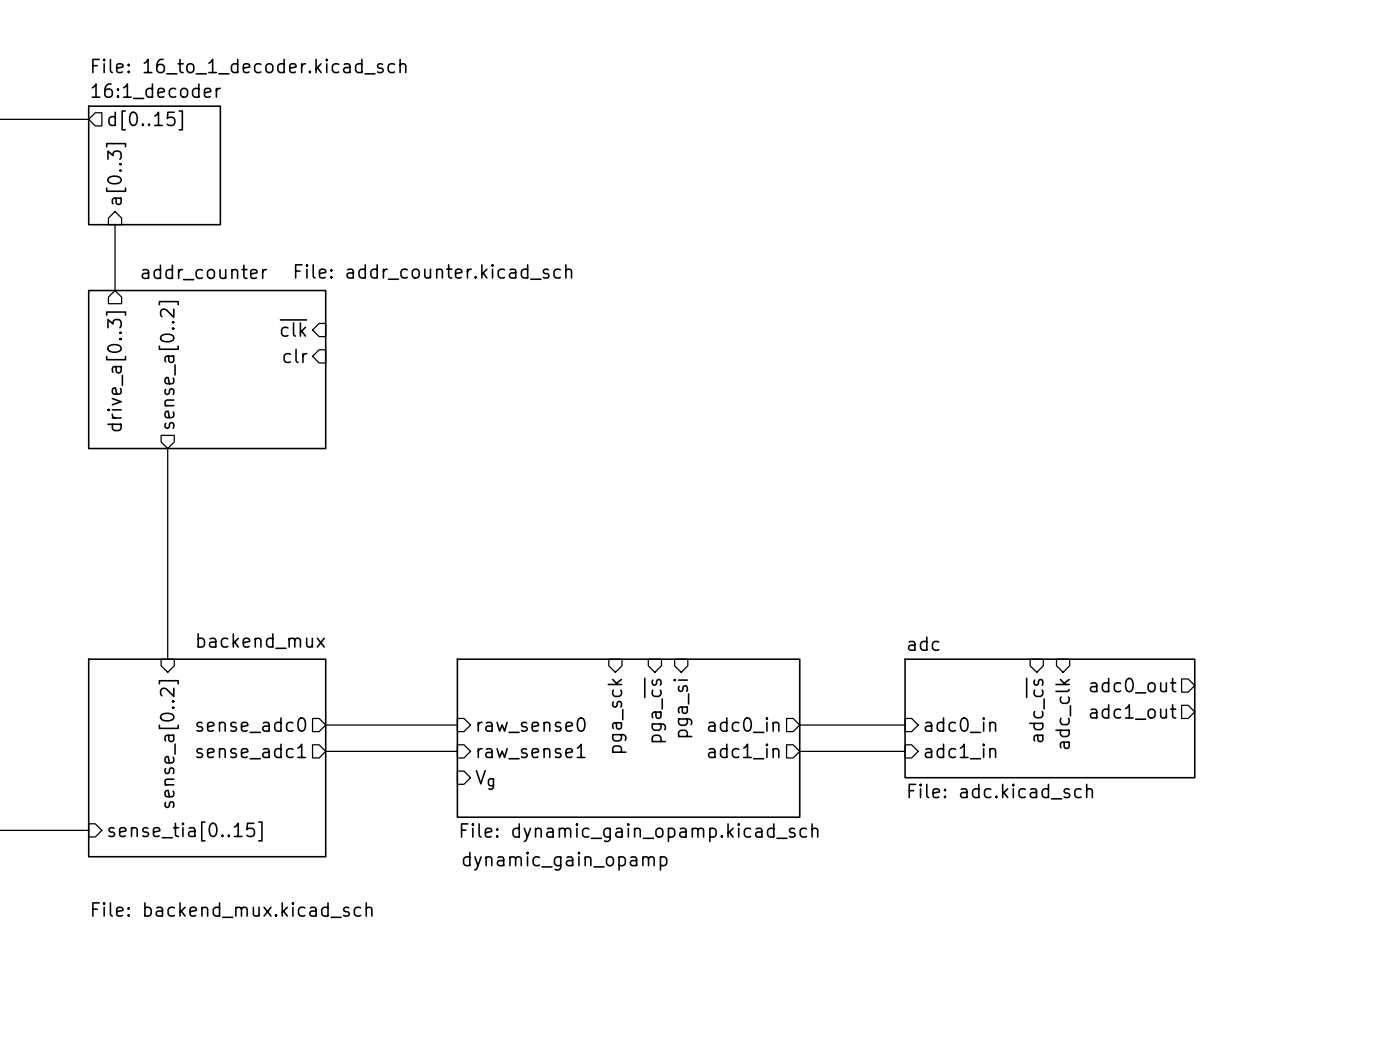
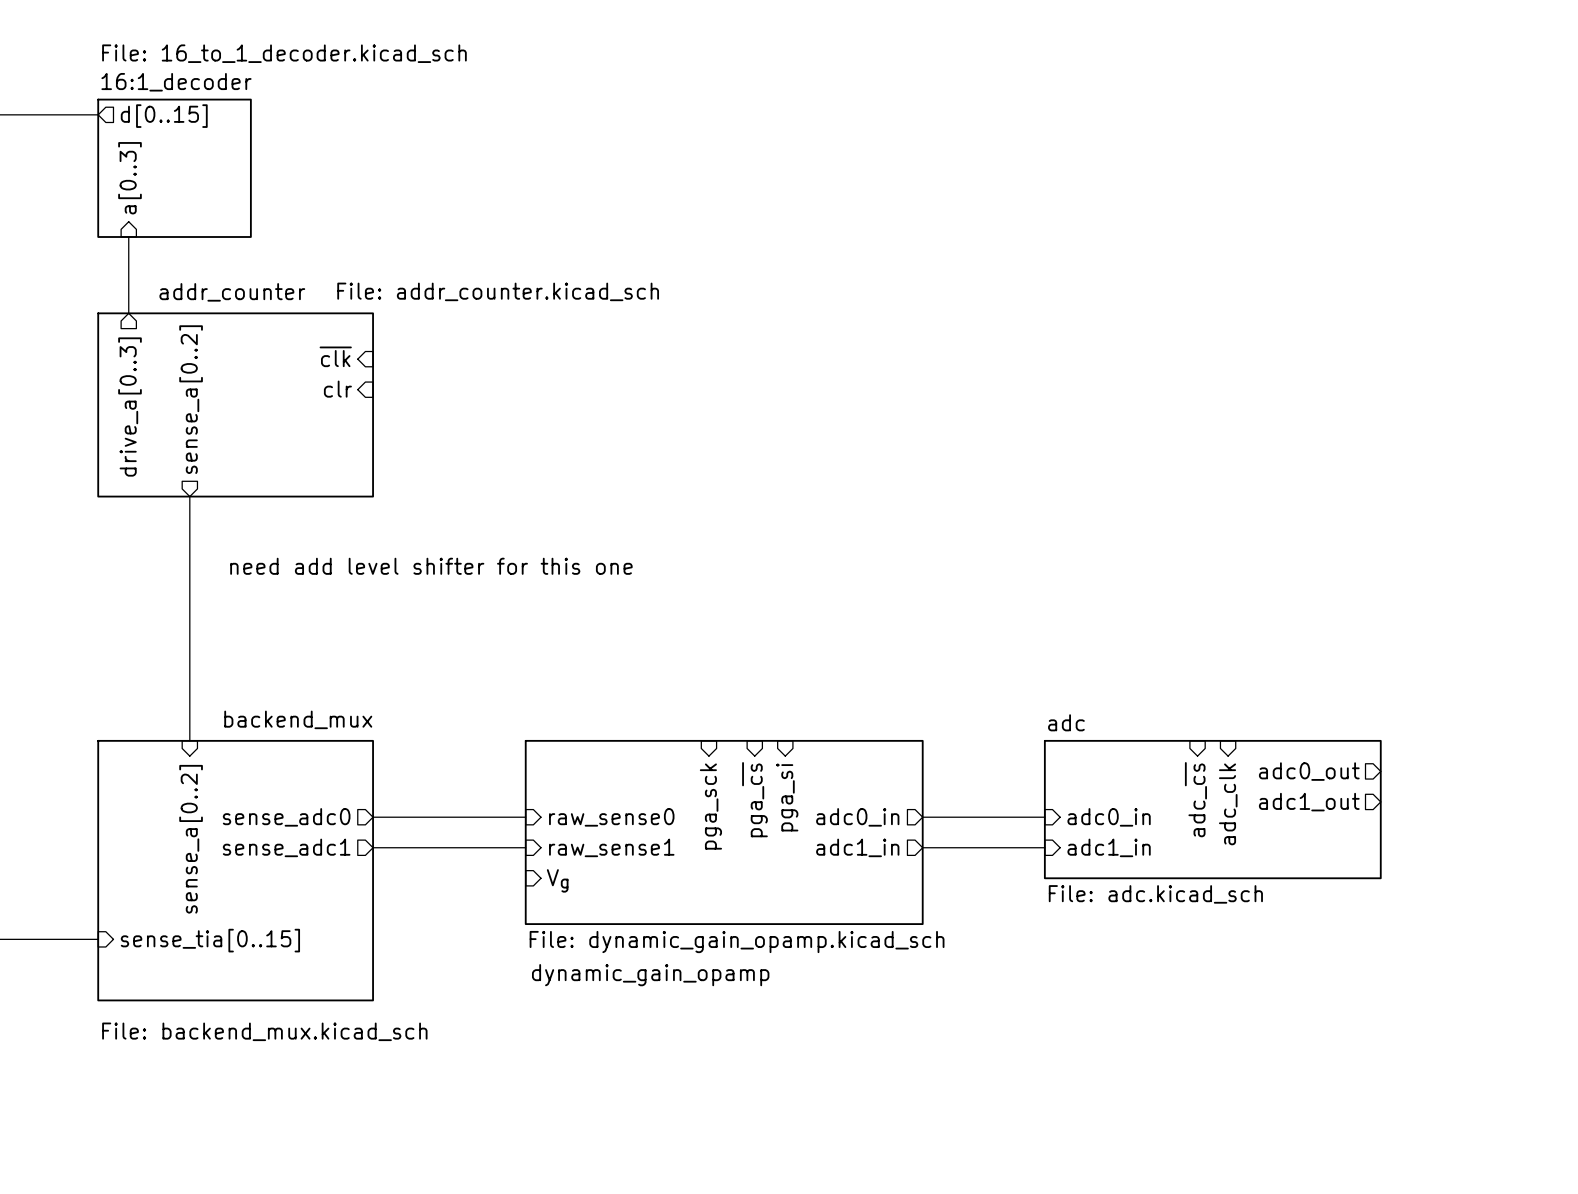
text: none -> need add level shifter for this one (431, 566)
sheet backend_mux: File: backend_mux.kicad_sch (207, 757) -> none
sheet backend_mux: none -> File: backend_mux.kicad_sch (235, 870)

